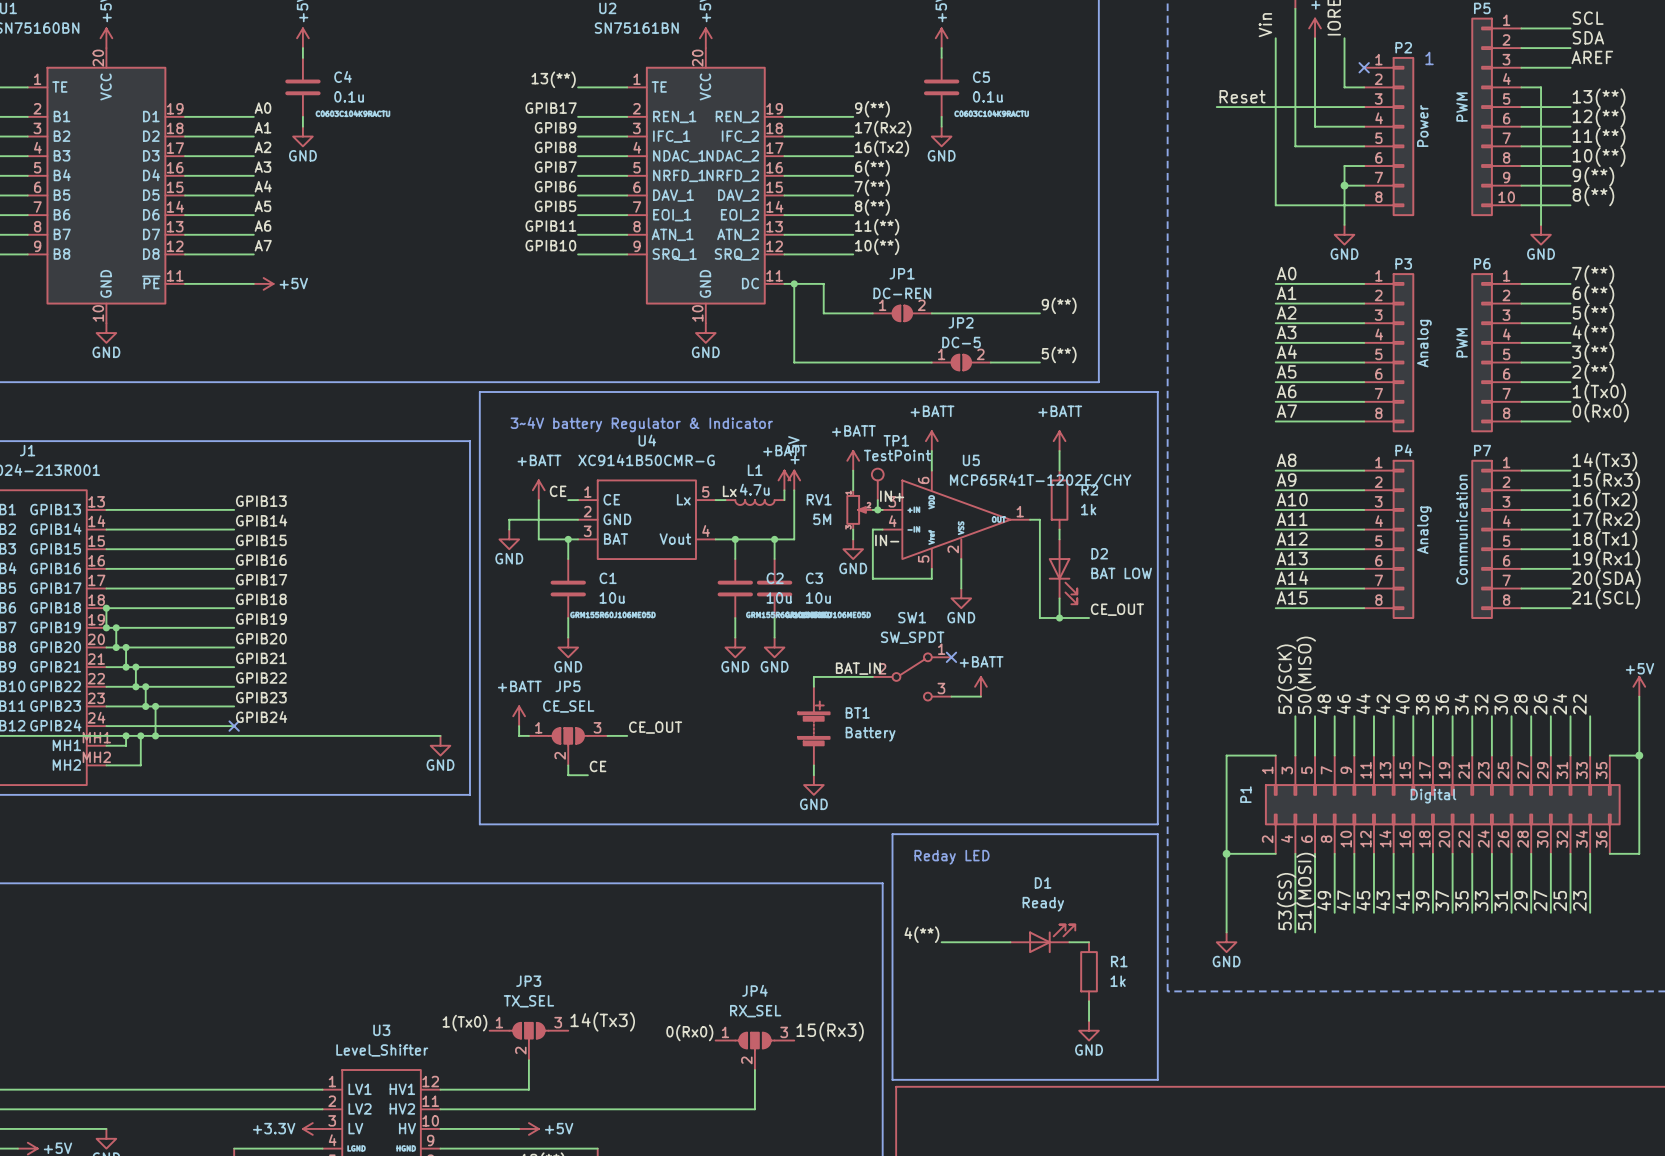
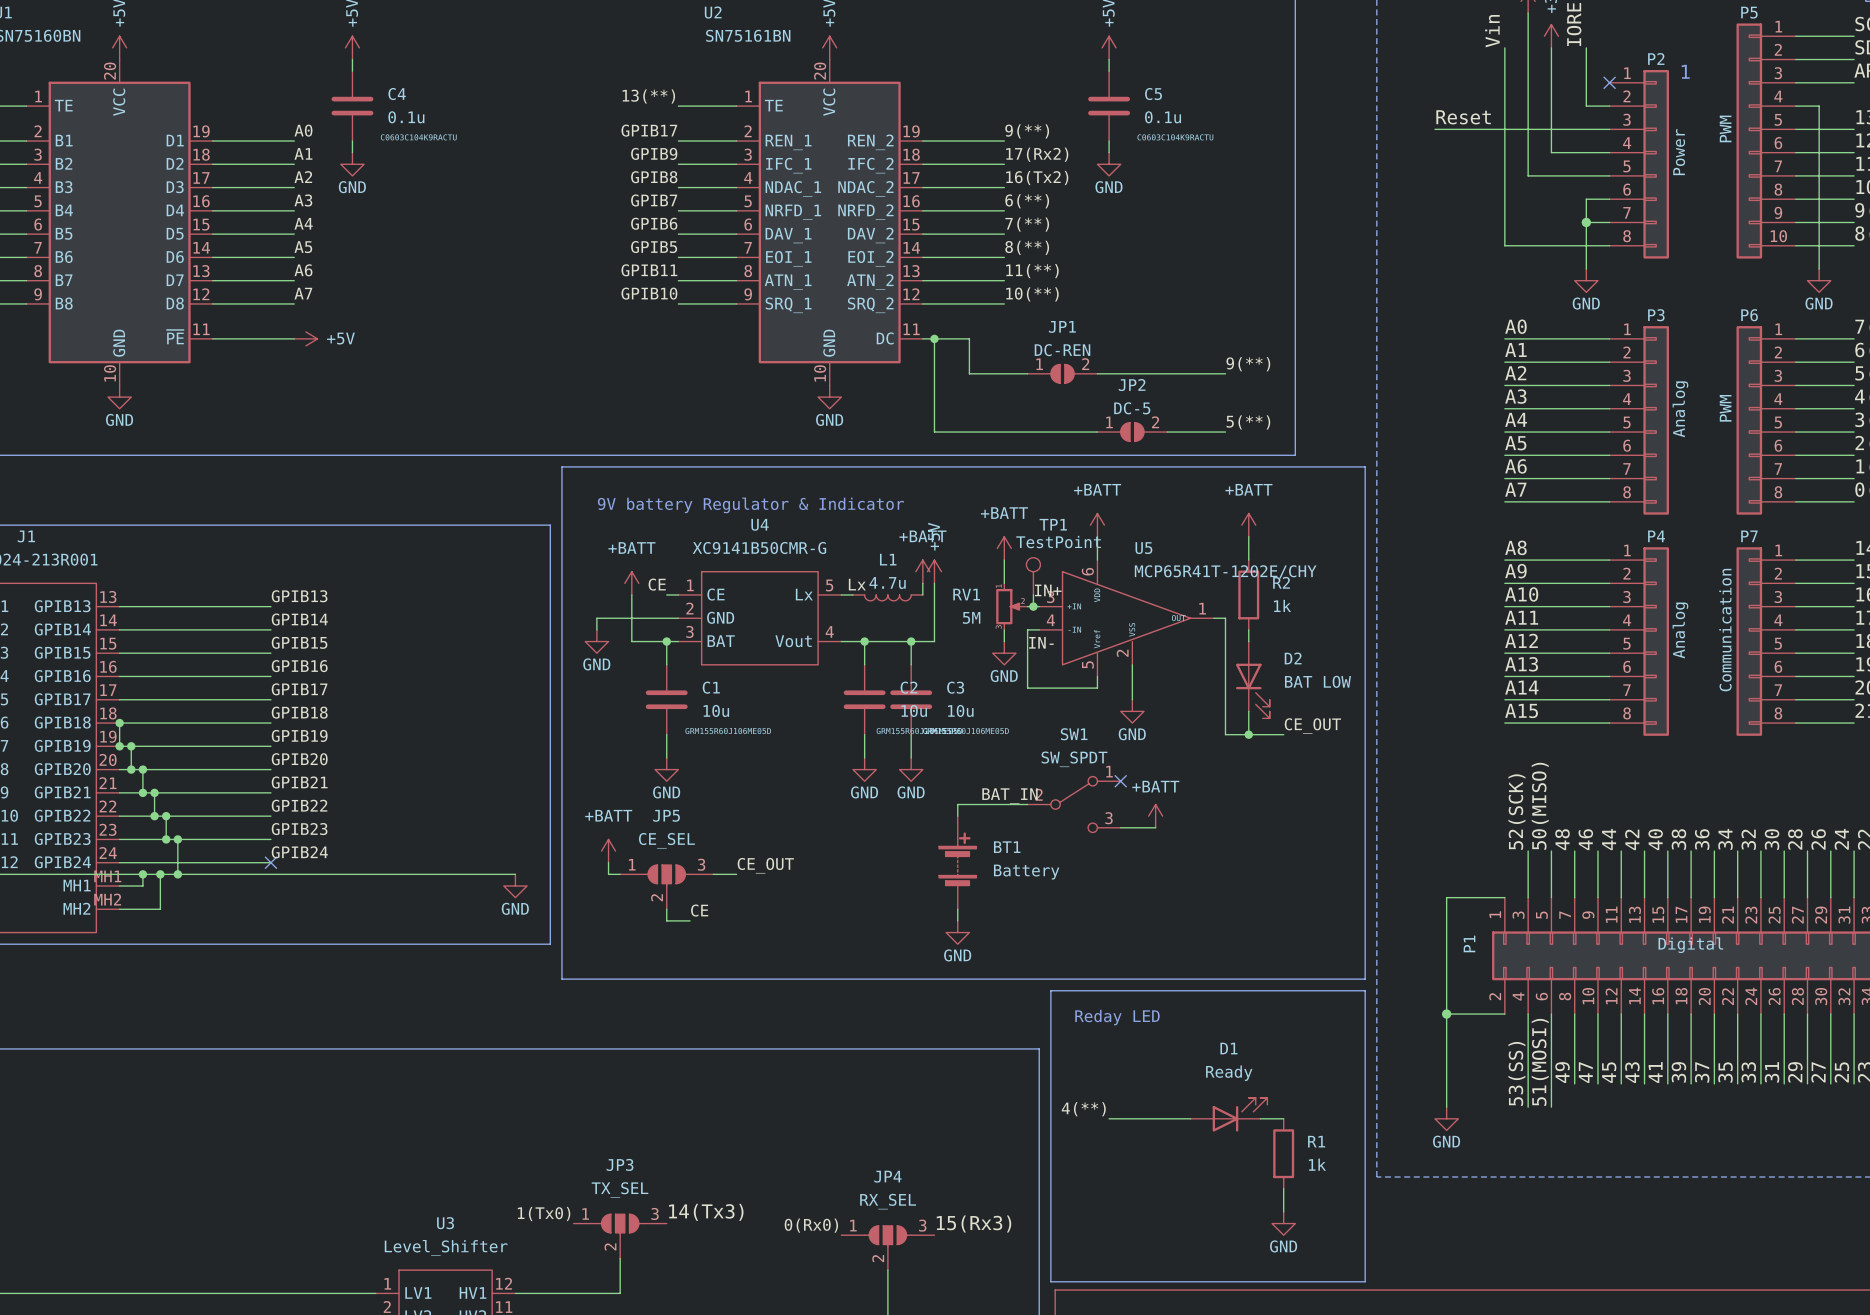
text: 3~4V battery Regulator & Indicator (641, 424) -> 9V battery Regulator & Indicator (750, 505)

